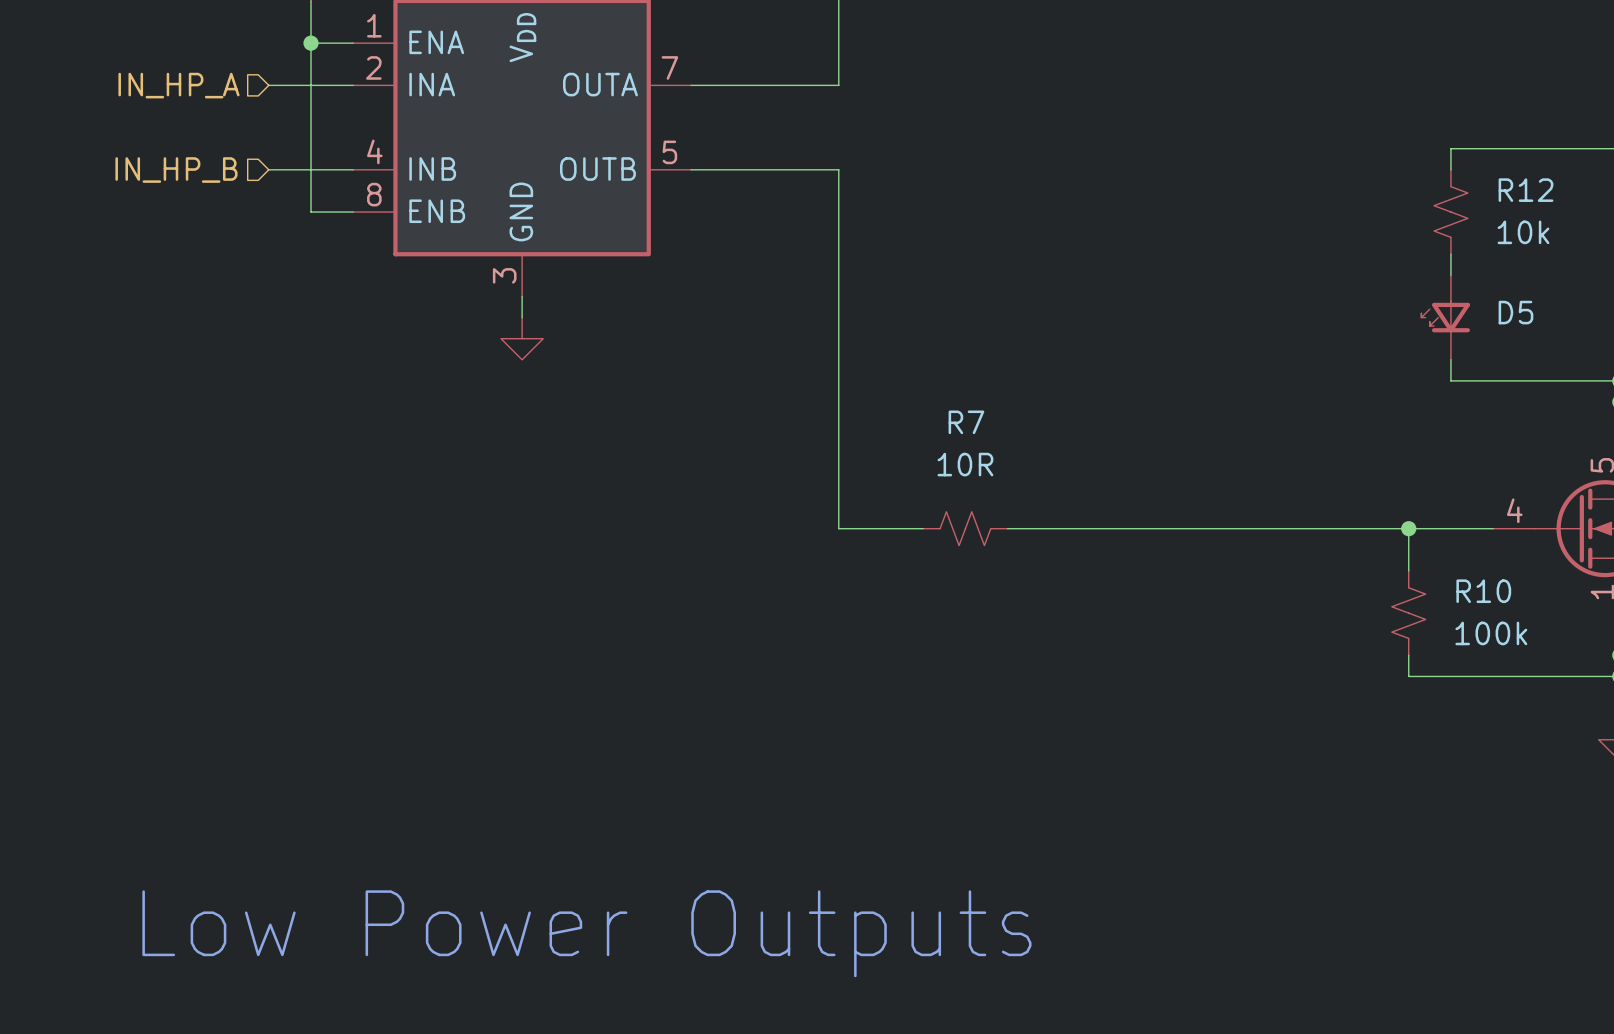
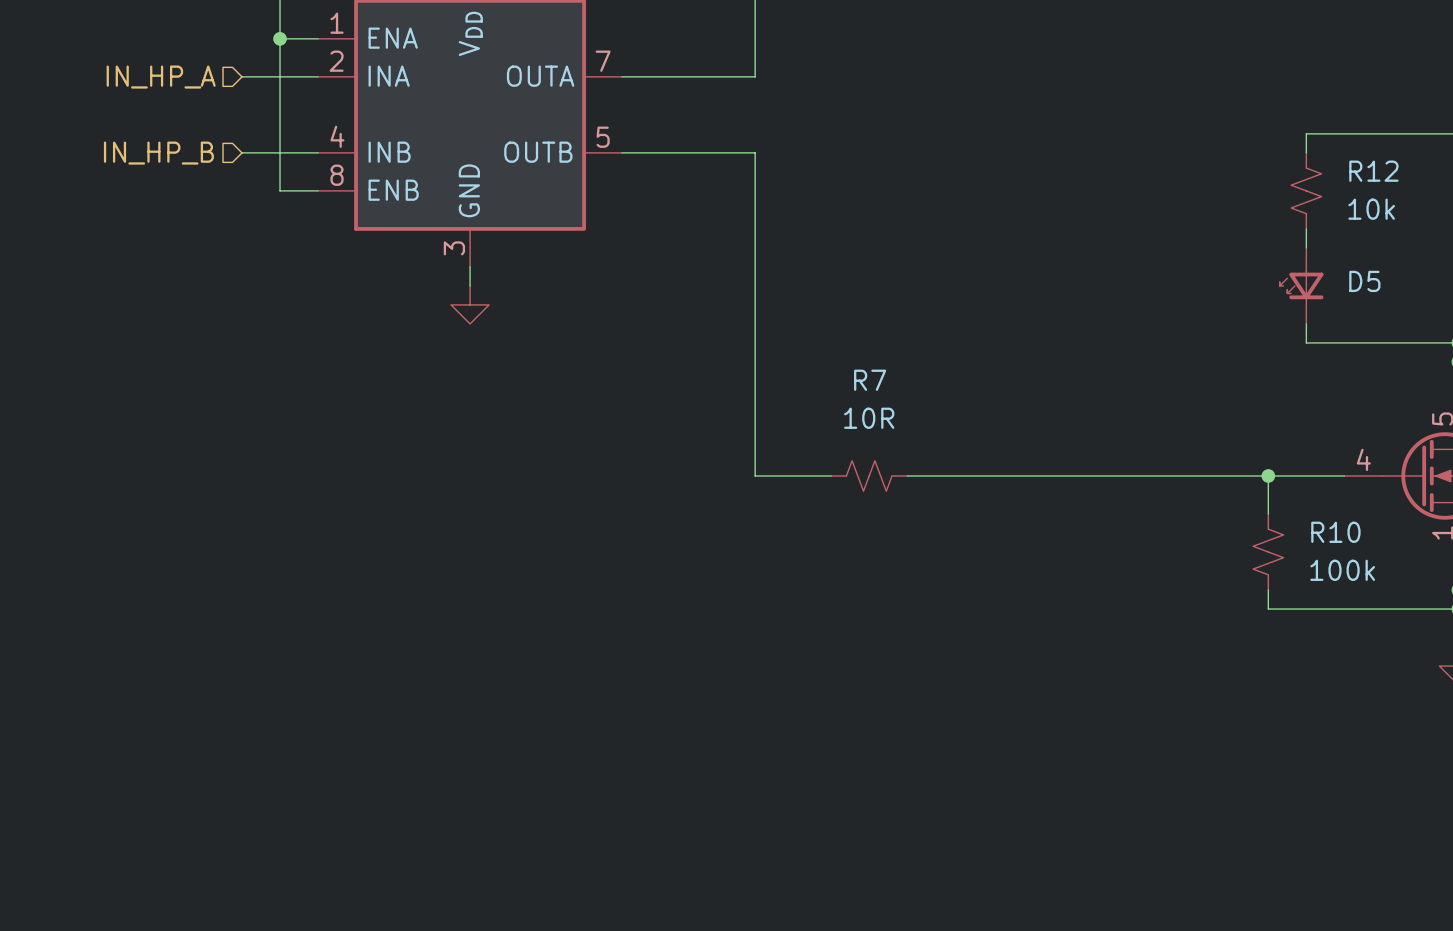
text: Low Power Outputs (586, 933) -> none

